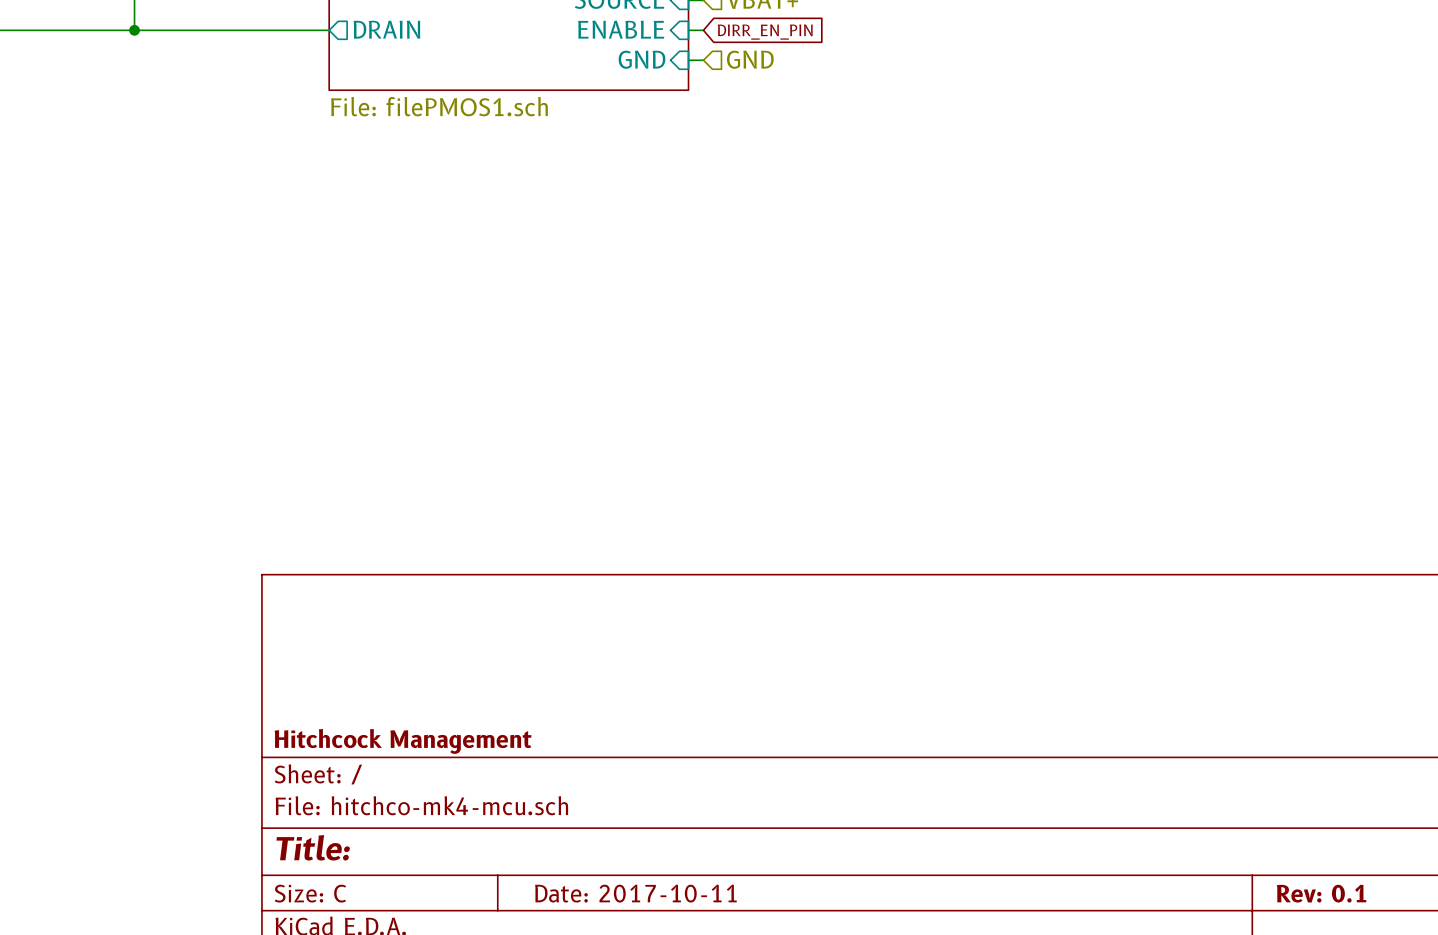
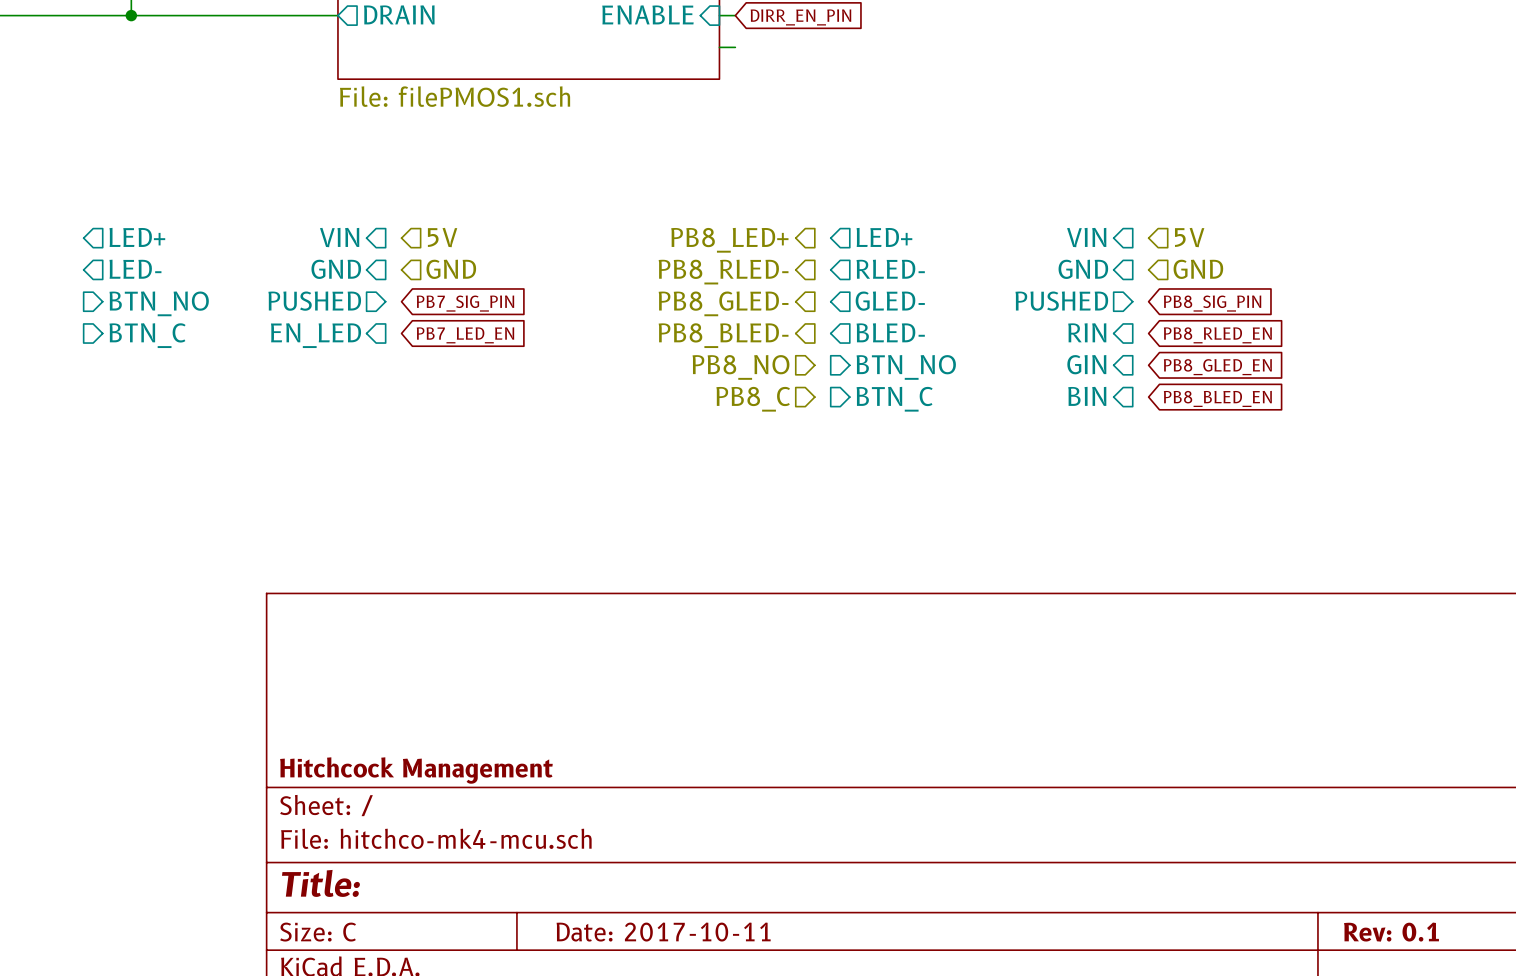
sheet pin: GND (641, 59) -> none
hierarchical label: GND (750, 59) -> none
sheet pin: none -> LED+ (137, 237)
sheet pin: none -> VIN (339, 237)
hierarchical label: none -> 5V (442, 237)
sheet pin: none -> LED+ (884, 237)
sheet pin: none -> VIN (1086, 237)
hierarchical label: none -> 5V (1189, 237)
hierarchical label: none -> PB8_LED+ (729, 240)
sheet pin: none -> LED- (135, 269)
sheet pin: none -> GND (336, 269)
hierarchical label: none -> GND (451, 269)
sheet pin: none -> RLED- (890, 269)
sheet pin: none -> GND (1083, 269)
hierarchical label: none -> GND (1198, 269)
hierarchical label: none -> PB8_RLED- (723, 272)
sheet pin: none -> PUSHED (314, 301)
sheet pin: none -> GLED- (890, 301)
sheet pin: none -> PUSHED (1061, 301)
sheet pin: none -> BTN_NO (159, 303)
global label: none -> PB7_SIG_PIN (465, 303)
hierarchical label: none -> PB8_GLED- (723, 303)
global label: none -> PB8_SIG_PIN (1212, 303)
sheet pin: none -> BLED- (890, 332)
sheet pin: none -> RIN (1087, 332)
sheet pin: none -> BTN_C (147, 335)
sheet pin: none -> EN_LED (316, 335)
global label: none -> PB7_LED_EN (465, 335)
hierarchical label: none -> PB8_BLED- (723, 335)
global label: none -> PB8_RLED_EN (1217, 335)
sheet pin: none -> GIN (1086, 364)
hierarchical label: none -> PB8_NO (740, 367)
sheet pin: none -> BTN_NO (906, 367)
global label: none -> PB8_GLED_EN (1217, 367)
sheet pin: none -> BIN (1087, 396)
hierarchical label: none -> PB8_C (753, 399)
sheet pin: none -> BTN_C (894, 399)
global label: none -> PB8_BLED_EN (1217, 398)

